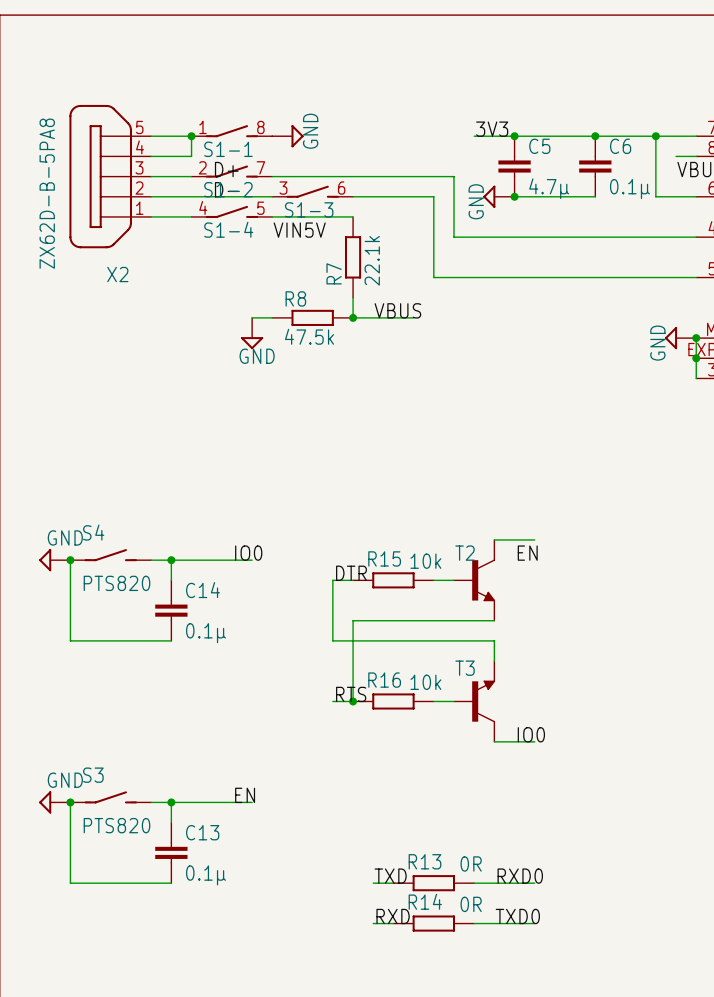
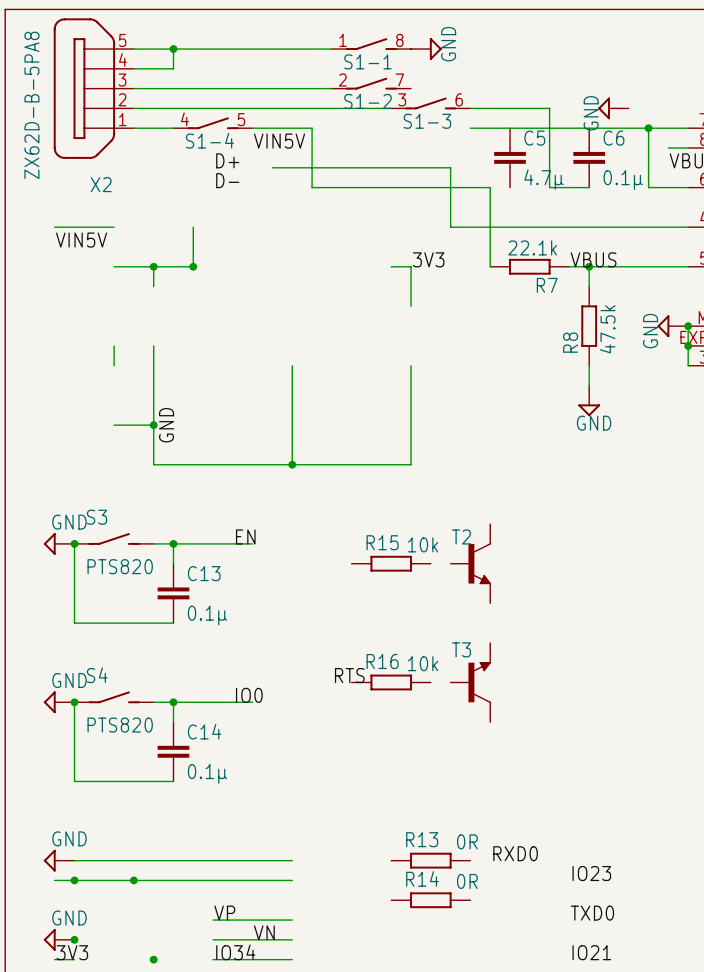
wire: none -> (133, 49) (331, 49)
wire: none -> (173, 49) (173, 68) (133, 68)
junction: none -> (173, 49)
power symbol: none -> GND (426, 49)
wire: none -> (133, 88) (331, 88)
wire: none -> (133, 108) (391, 108)
power symbol: none -> GND (613, 108)
label position: 3V3 (492, 129) -> 3V3 (428, 259)
S1-1 position: (231, 131) -> (371, 44)
wire: (171, 136) (191, 136) (191, 156) (151, 156) -> none
junction: (191, 136) -> none
wire: none -> (252, 128) (312, 128) (312, 187) (351, 187)
power symbol: GND (287, 136) -> none
junction: (514, 136) -> none
junction: (595, 136) -> none
S1-2 position: (231, 171) -> (371, 83)
X2 position: (110, 176) -> (93, 88)
wire: (151, 176) (191, 176) -> none
S1-3 position: (312, 191) -> (430, 103)
wire: (151, 196) (272, 196) -> none
wire: (433, 196) (433, 277) (575, 277) -> (430, 187) (490, 187) (490, 266)
power symbol: GND (498, 196) -> none
wire: (514, 196) (554, 196) -> (470, 108) (549, 108) (549, 187)
junction: (514, 196) -> none
S1-4 position: (231, 211) -> (213, 123)
wire: (151, 216) (191, 216) -> none
wire: (272, 216) (353, 216) -> none
label position: VIN5V (299, 230) -> VIN5V (279, 141)
wire: none -> (54, 227) (114, 227)
wire: none -> (193, 227) (193, 266) (114, 266)
label: none -> VIN5V (81, 240)
R7 rotation: 0° (353, 257) -> 90° clockwise (529, 266)
R7 position: (353, 257) -> (529, 266)
R7 value position: 22.1k (372, 260) -> 22.1k (532, 247)
label: none -> VBUS (593, 259)
R7 name position: R7 (334, 273) -> R7 (547, 285)
wire: none -> (153, 266) (153, 286)
junction: none -> (153, 266)
junction: none -> (193, 266)
wire: none -> (589, 266) (589, 286)
junction: none -> (589, 266)
wire: (353, 297) (353, 317) (413, 317) -> (391, 266) (411, 266) (411, 306)
R8 name position: R8 (295, 298) -> R8 (570, 342)
label: VBUS (397, 310) -> none
wire: (252, 317) (272, 317) -> none
R8 rotation: 0° (312, 317) -> 90° clockwise (589, 326)
R8 position: (312, 317) -> (589, 326)
junction: (353, 317) -> none
power symbol: GND (252, 333) -> none
R8 value position: 47.5k (309, 336) -> 47.5k (607, 329)
wire: none -> (114, 345) (114, 365)
wire: none -> (153, 345) (153, 464) (411, 464) (411, 365)
wire: none -> (292, 365) (292, 464)
wire: none -> (589, 365) (589, 385)
power symbol: none -> GND (589, 400)
wire: none -> (114, 425) (153, 425)
junction: none -> (153, 425)
label: none -> GND (166, 425)
junction: none -> (292, 464)
S4 name: S4 (93, 532) -> S3 (97, 517)
wire: (494, 539) (534, 539) -> none
label: IO0 (248, 553) -> EN (245, 536)
label: EN (527, 553) -> none
label: DTR (351, 573) -> none
wire: (353, 580) (332, 580) (332, 640) (494, 640) (494, 661) -> none
wire: (433, 580) (454, 580) -> none
C14 name: C14 (203, 590) -> C13 (204, 573)
wire: (494, 620) (353, 620) (353, 701) (332, 701) -> none
junction: (353, 701) -> none
wire: (433, 701) (454, 701) -> none
label: none -> IO0 (249, 695)
S4: none -> PTS820 (114, 697)
power symbol: none -> GND (59, 702)
wire: none -> (74, 702) (74, 781) (153, 781)
junction: none -> (74, 702)
wire: none -> (153, 702) (252, 702)
wire: none -> (173, 702) (173, 722)
junction: none -> (173, 702)
label: IO0 (531, 734) -> none
wire: (494, 741) (534, 741) -> none
C14: none -> 0.1µ (173, 751)
label: EN (245, 795) -> none
S3: PTS820 (110, 797) -> none
power symbol: GND (54, 802) -> none
wire: (70, 802) (70, 883) -> none
junction: (70, 802) -> none
junction: (171, 802) -> none
wire: (252, 802) (171, 802) (171, 822) -> none
C13: 0.1µ (171, 852) -> none
label: TXD (390, 876) -> none
power symbol: none -> GND (59, 860)
wire: none -> (173, 860) (292, 860)
wire: (373, 883) (393, 883) -> none
wire: (474, 883) (534, 883) -> none
label: none -> IO23 (591, 873)
wire: none -> (54, 880) (292, 880)
junction: none -> (74, 880)
junction: none -> (133, 880)
label: RXD (393, 916) -> none
label position: TXD0 (517, 916) -> TXD0 (592, 913)
wire: (373, 923) (393, 923) -> none
wire: (474, 923) (534, 923) -> none
label: none -> VP (224, 913)
wire: none -> (213, 920) (292, 920)
label: none -> VN (264, 932)
power symbol: none -> GND (59, 939)
junction: none -> (74, 939)
wire: none -> (213, 939) (292, 939)
label: none -> IO34 (235, 952)
label: none -> 3V3 (72, 952)
label: none -> IO21 (591, 952)
wire: none -> (54, 959) (74, 959)
junction: none -> (153, 959)
wire: none -> (213, 959) (292, 959)

